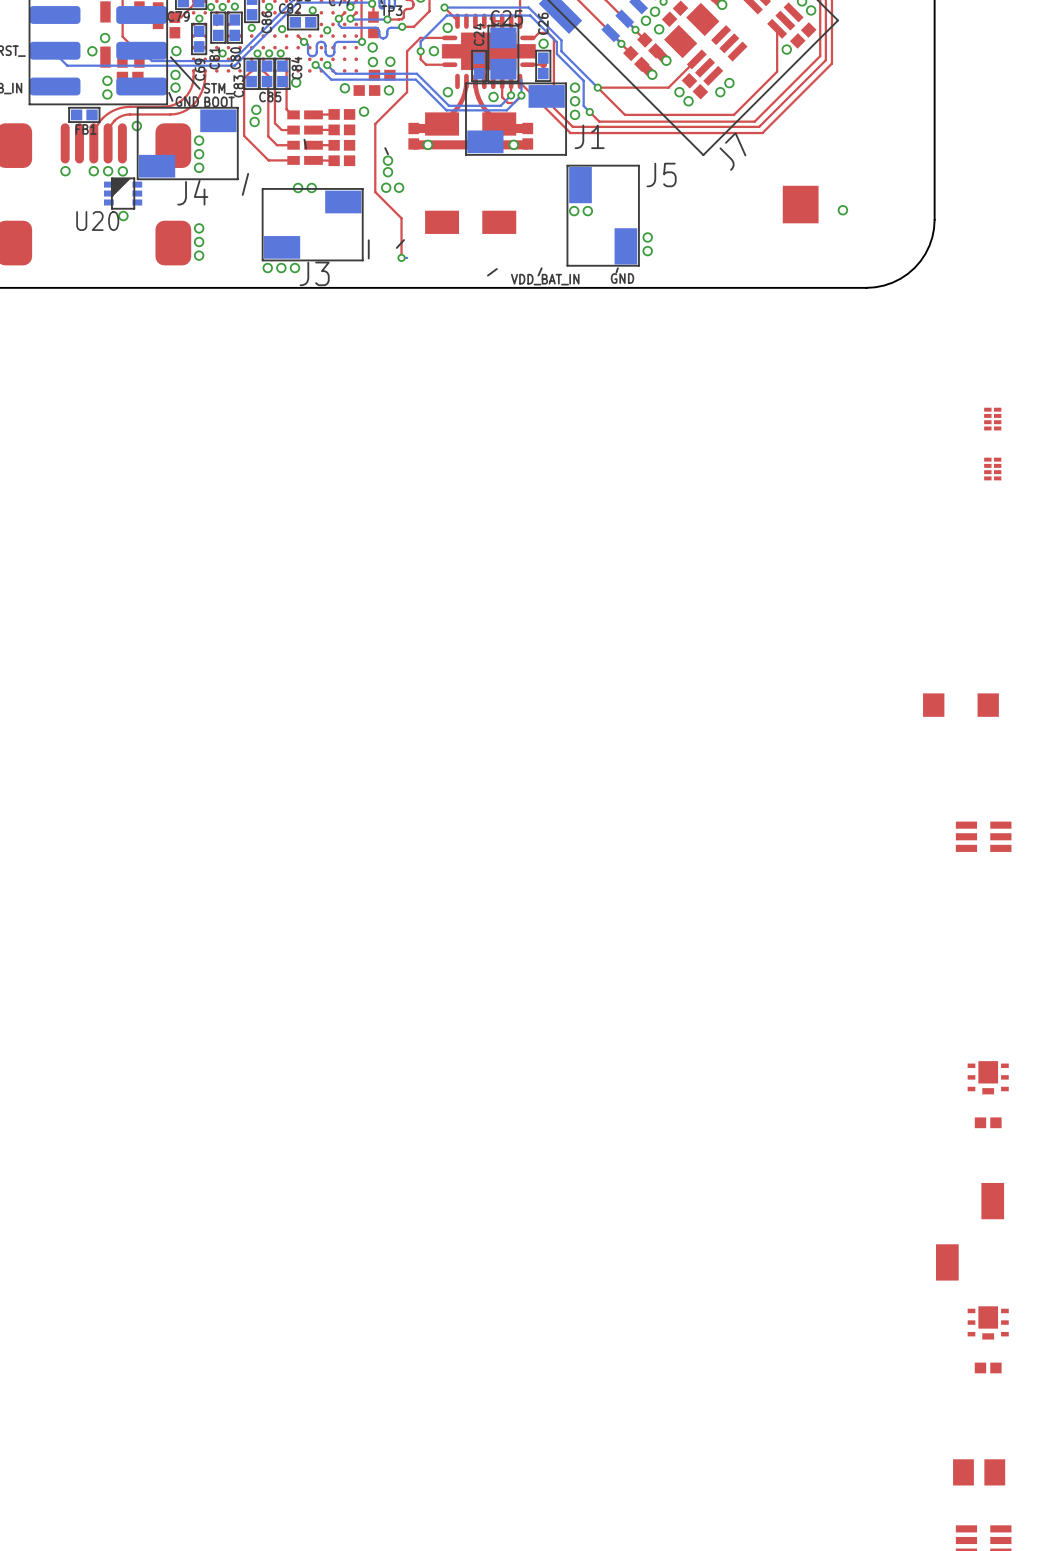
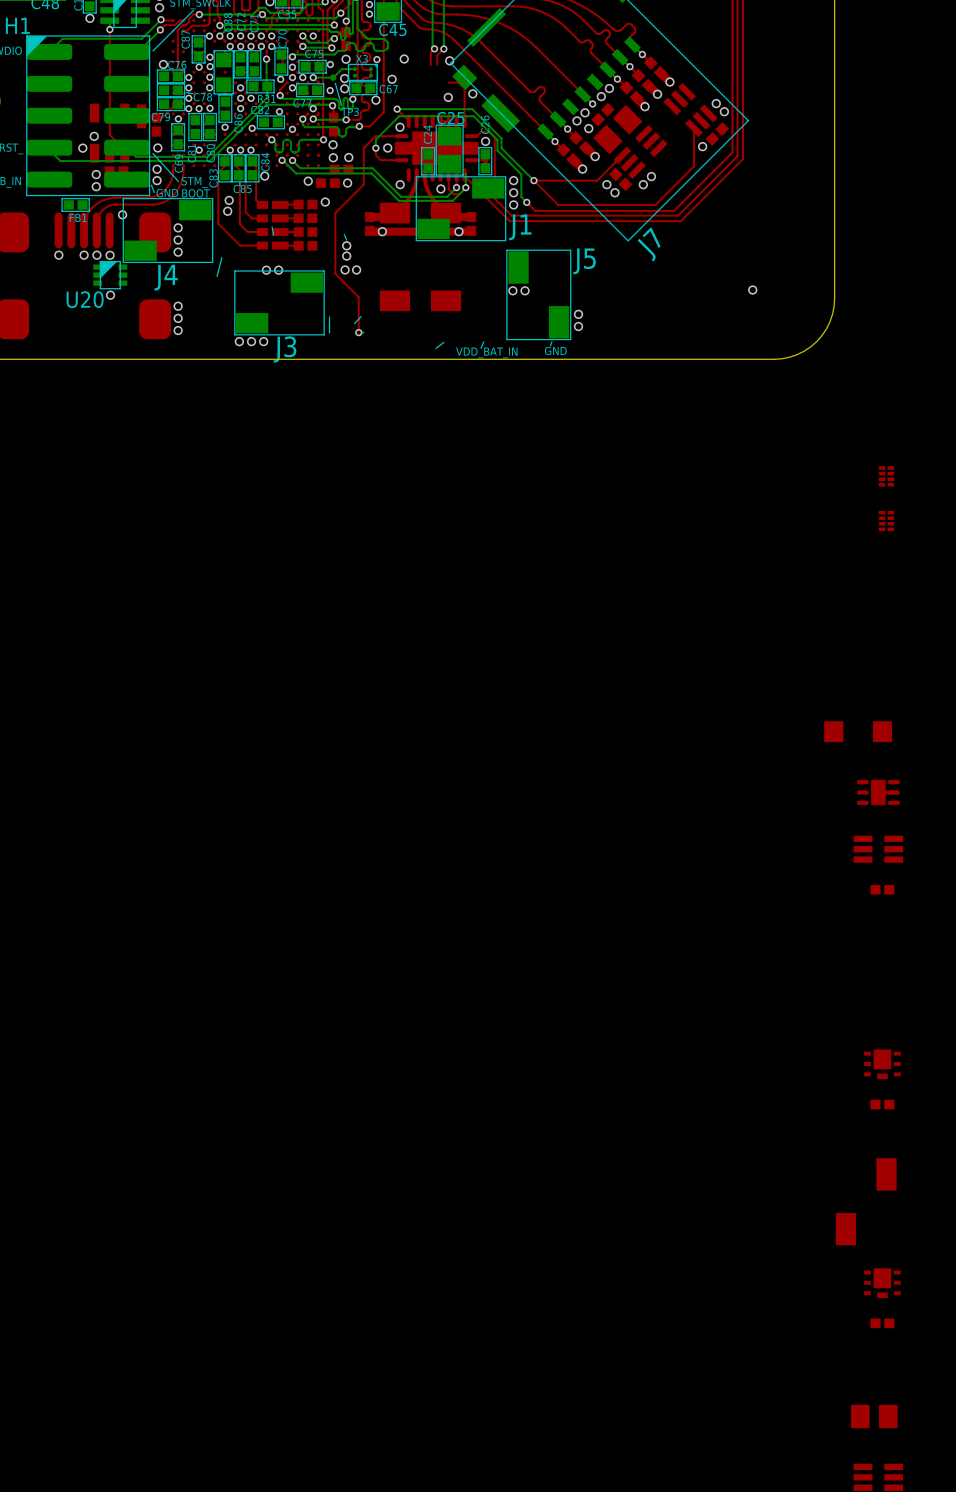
drawing: [782, 185, 819, 224] -> none
part: none -> (878, 792)
part: none -> (882, 889)

